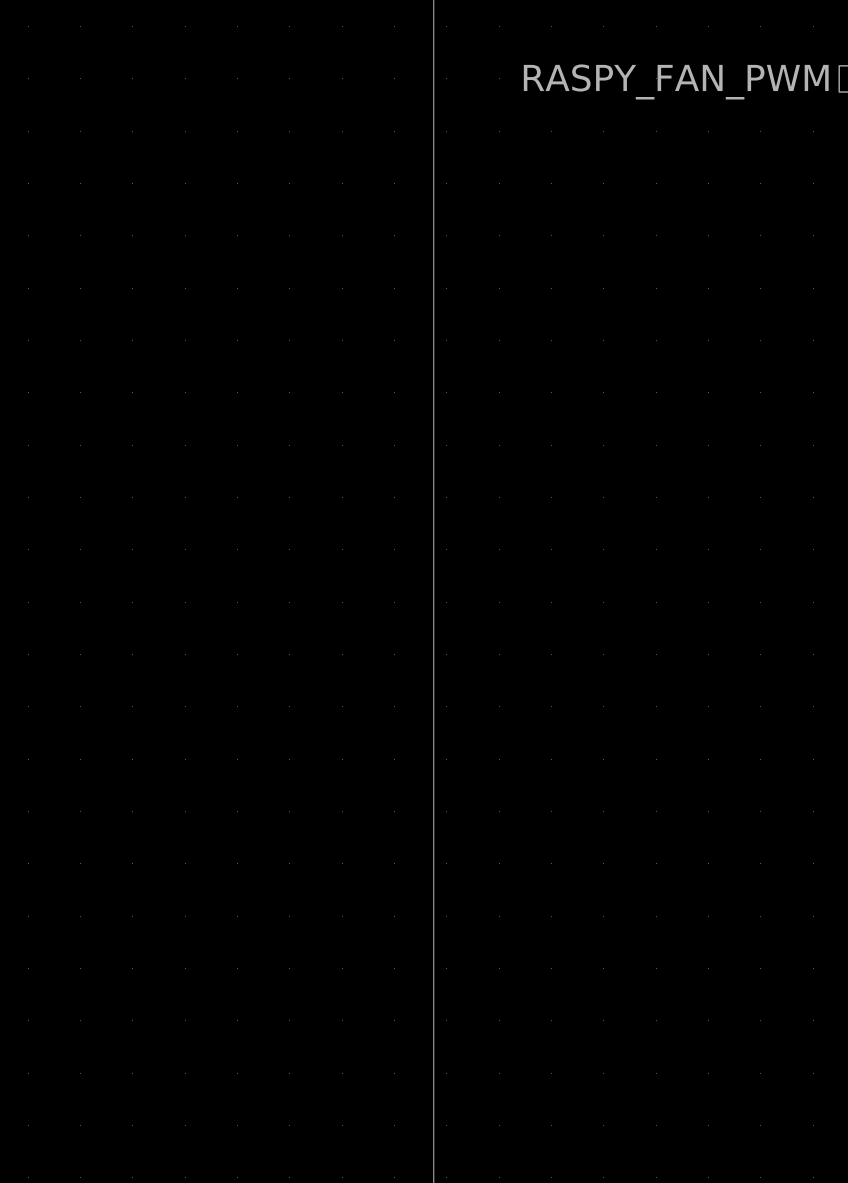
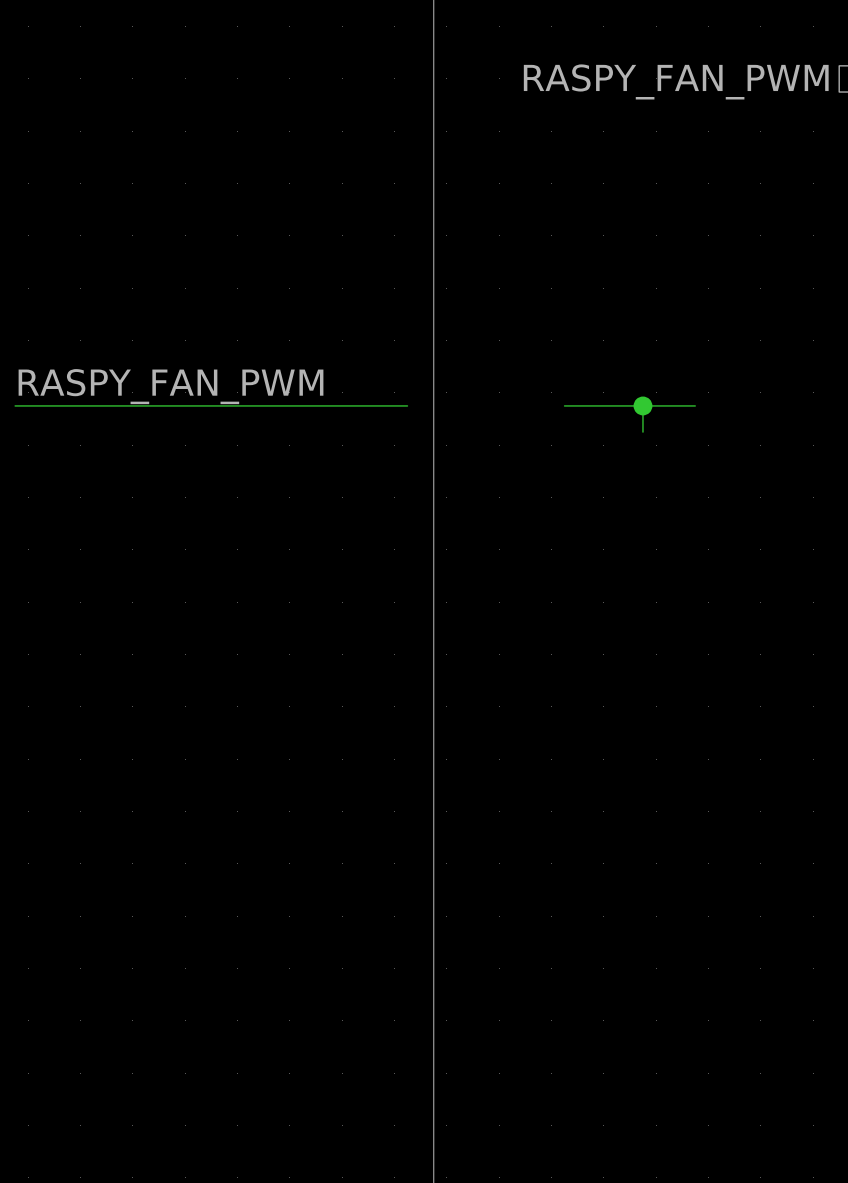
label: none -> RASPY_FAN_PWM (171, 386)
wire: none -> (15, 405) (407, 405)
wire: none -> (564, 405) (695, 405)
wire: none -> (642, 405) (642, 432)
junction: none -> (642, 405)

